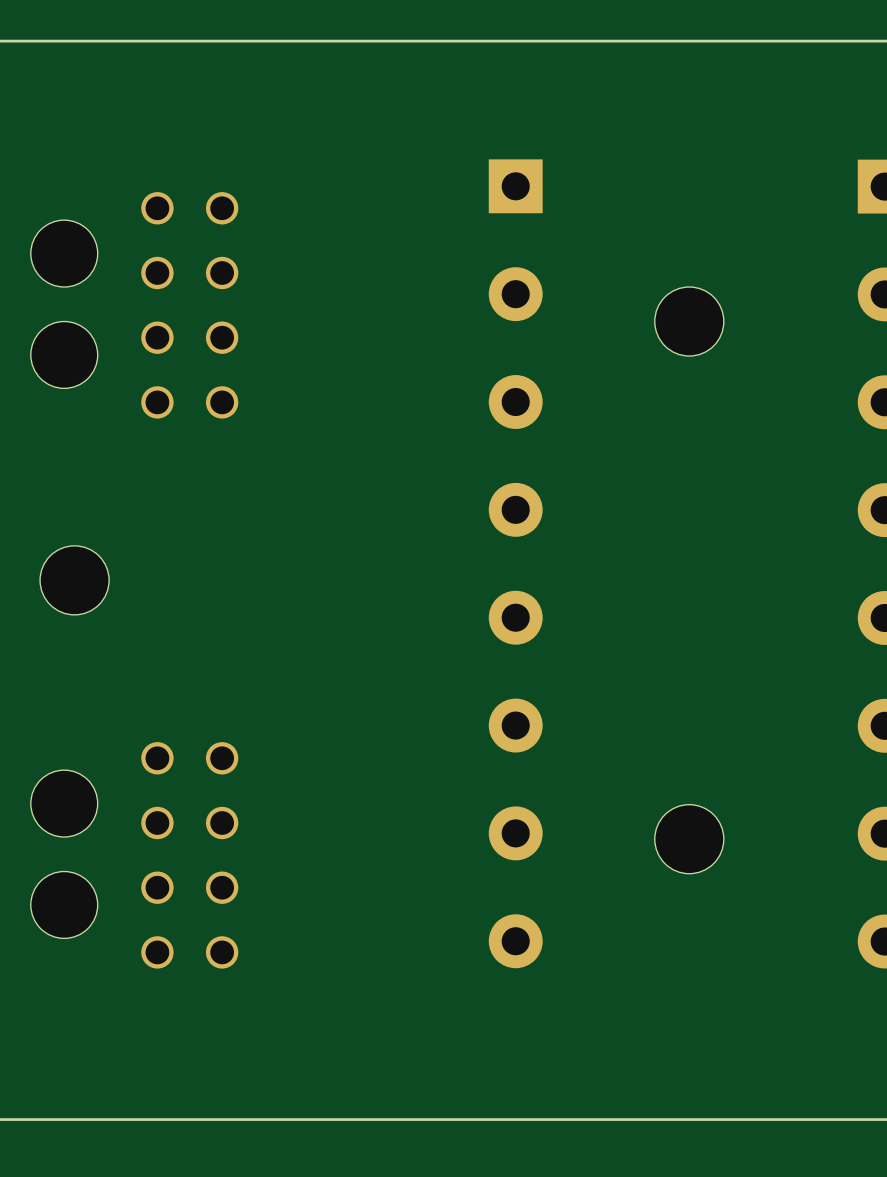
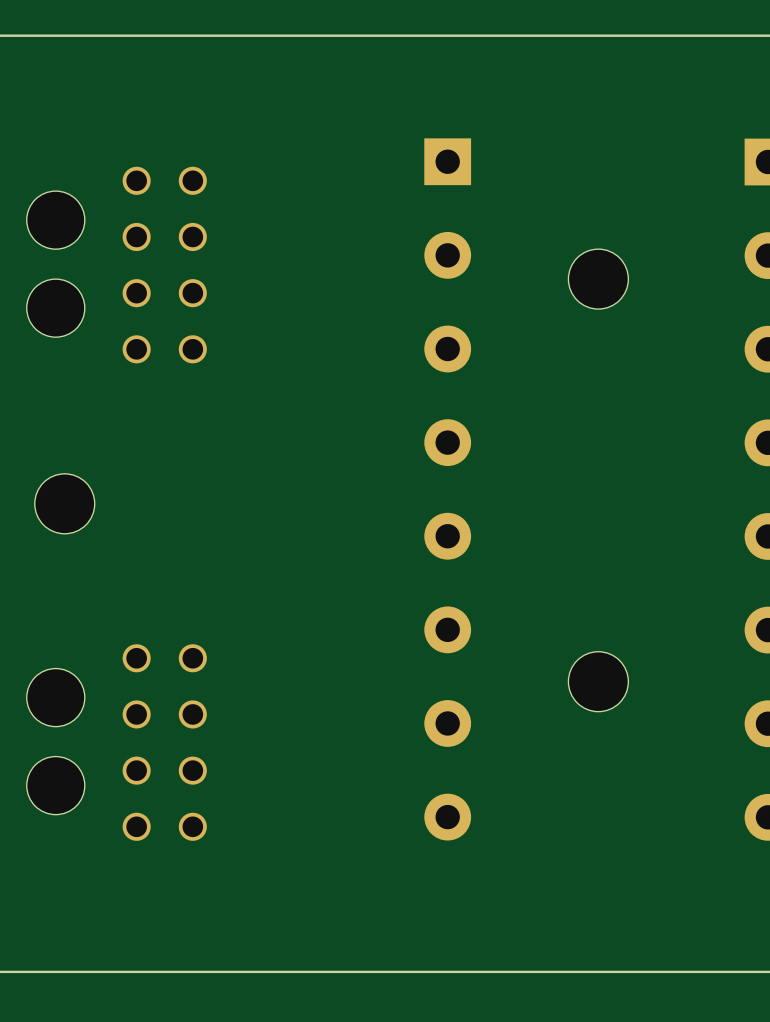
part position: (689, 839) -> (598, 681)

